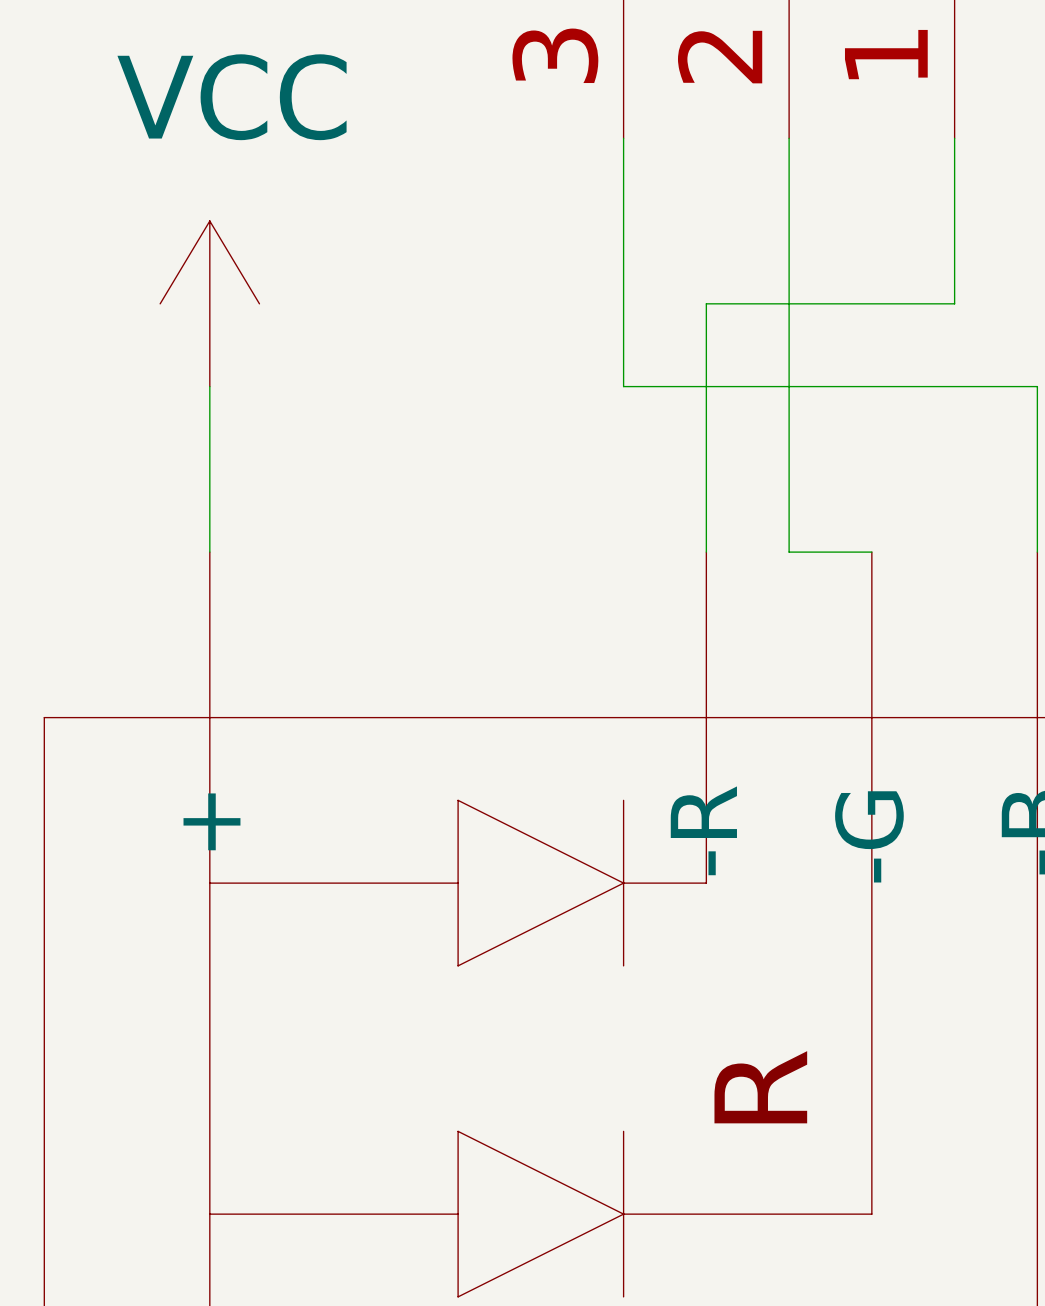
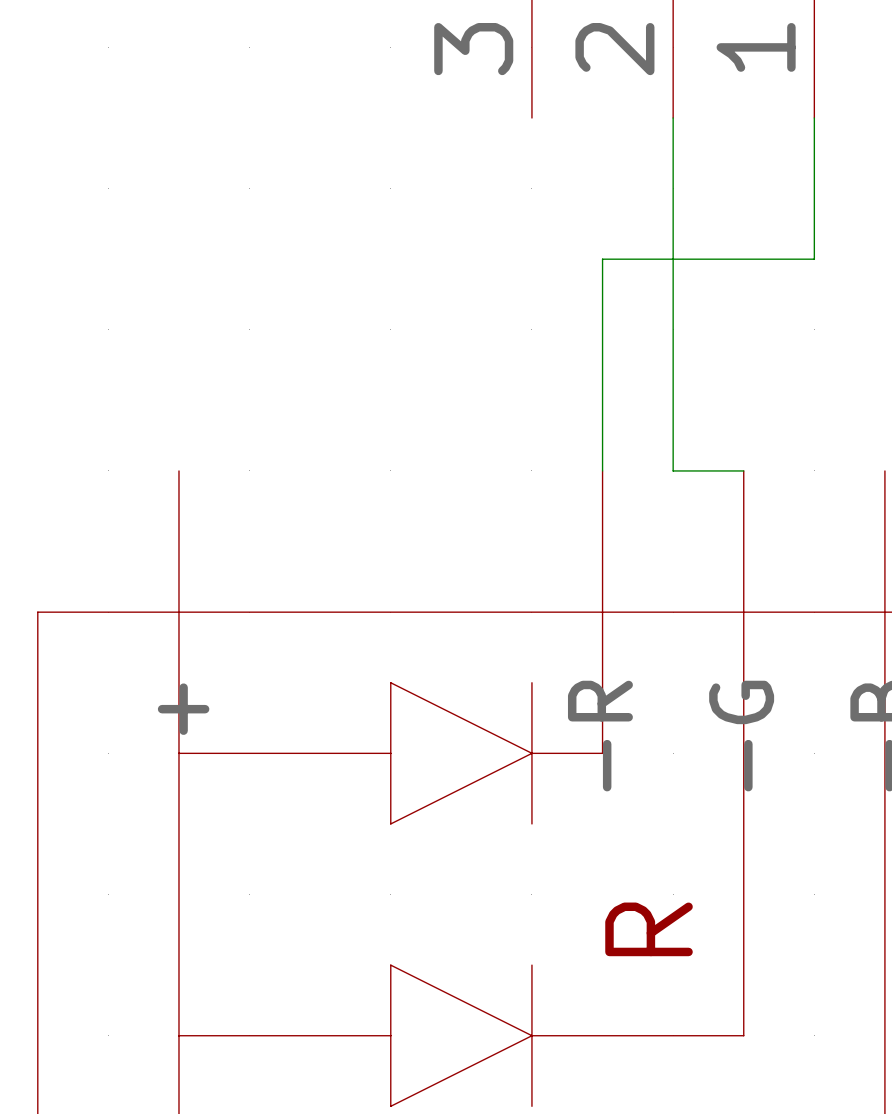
wire: (623, 138) (623, 386) (1037, 386) (1037, 552) -> none
power symbol: VCC (209, 303) -> none
wire: (209, 386) (209, 552) -> none

